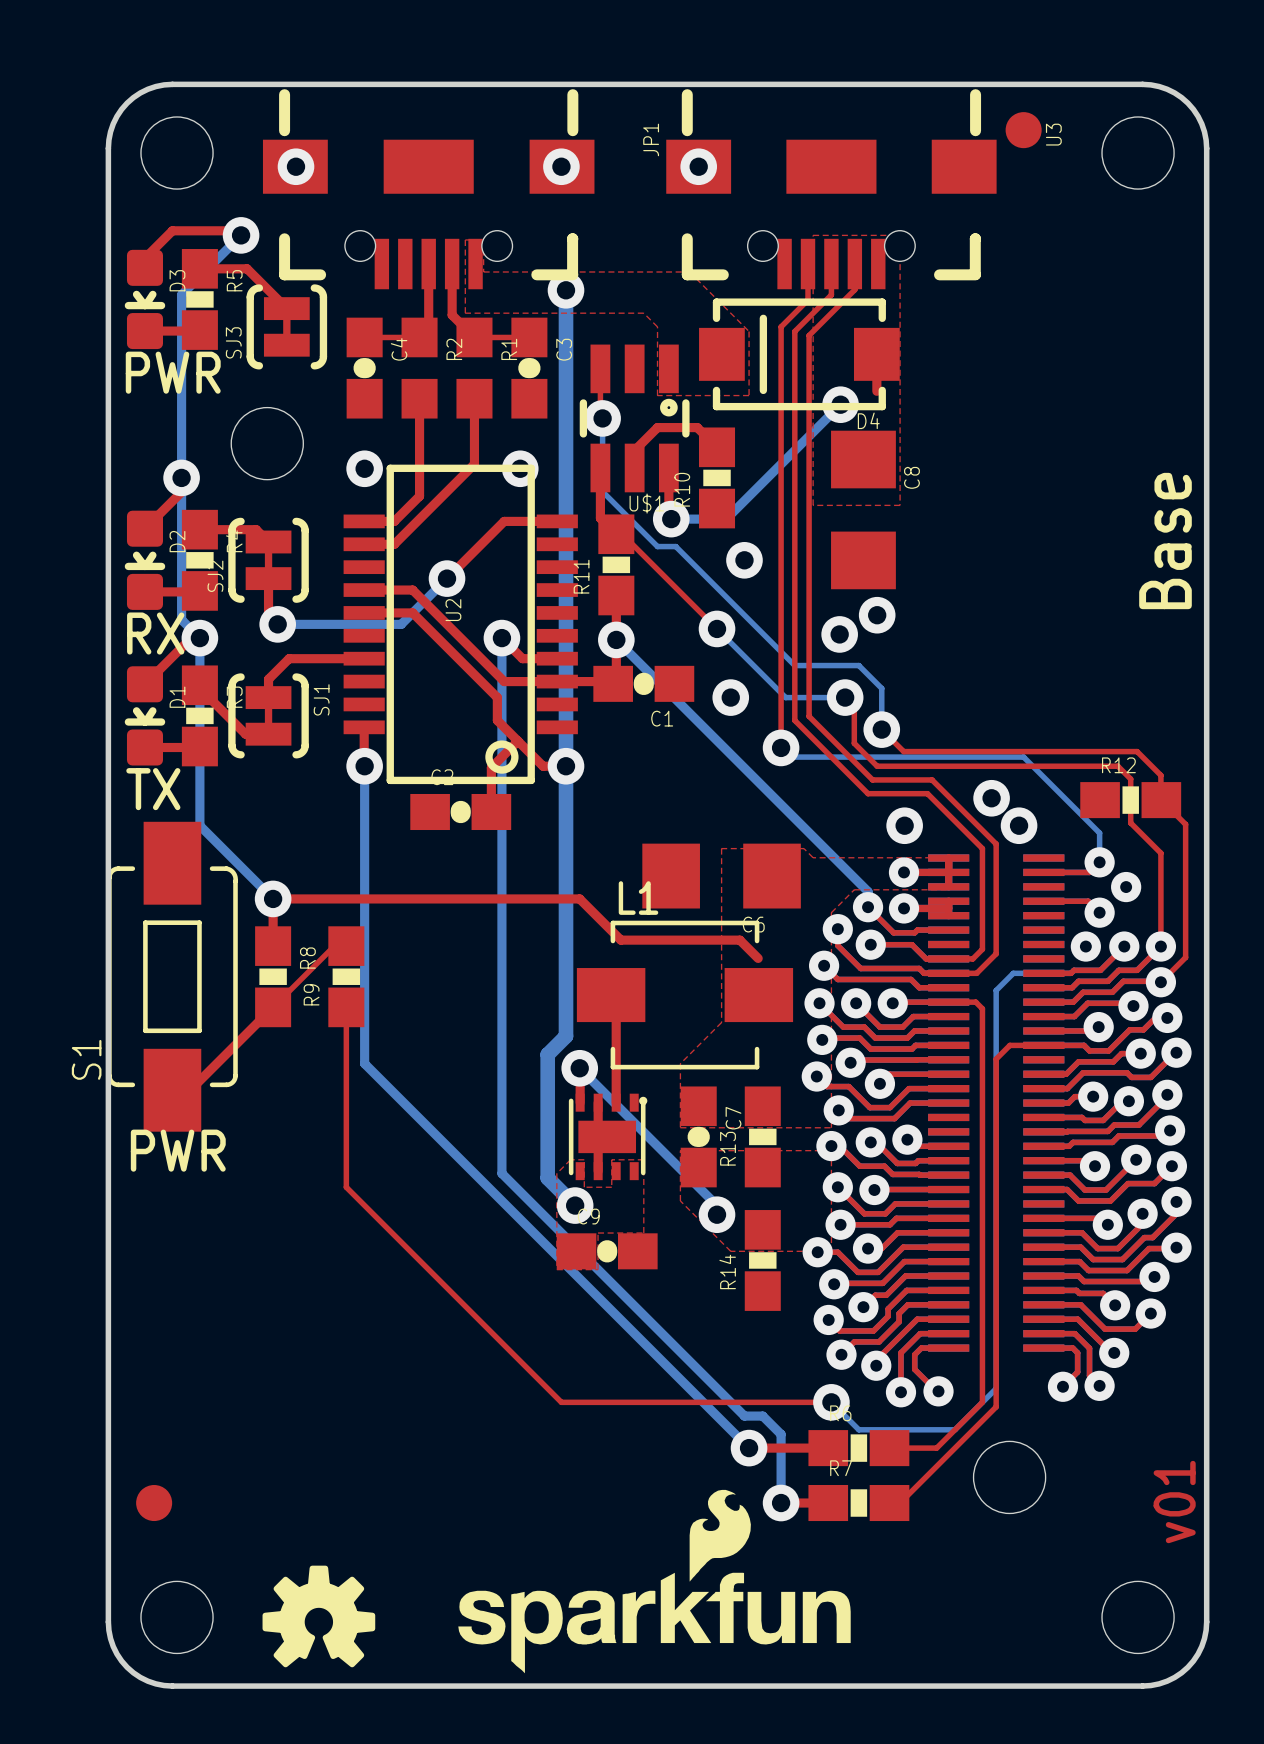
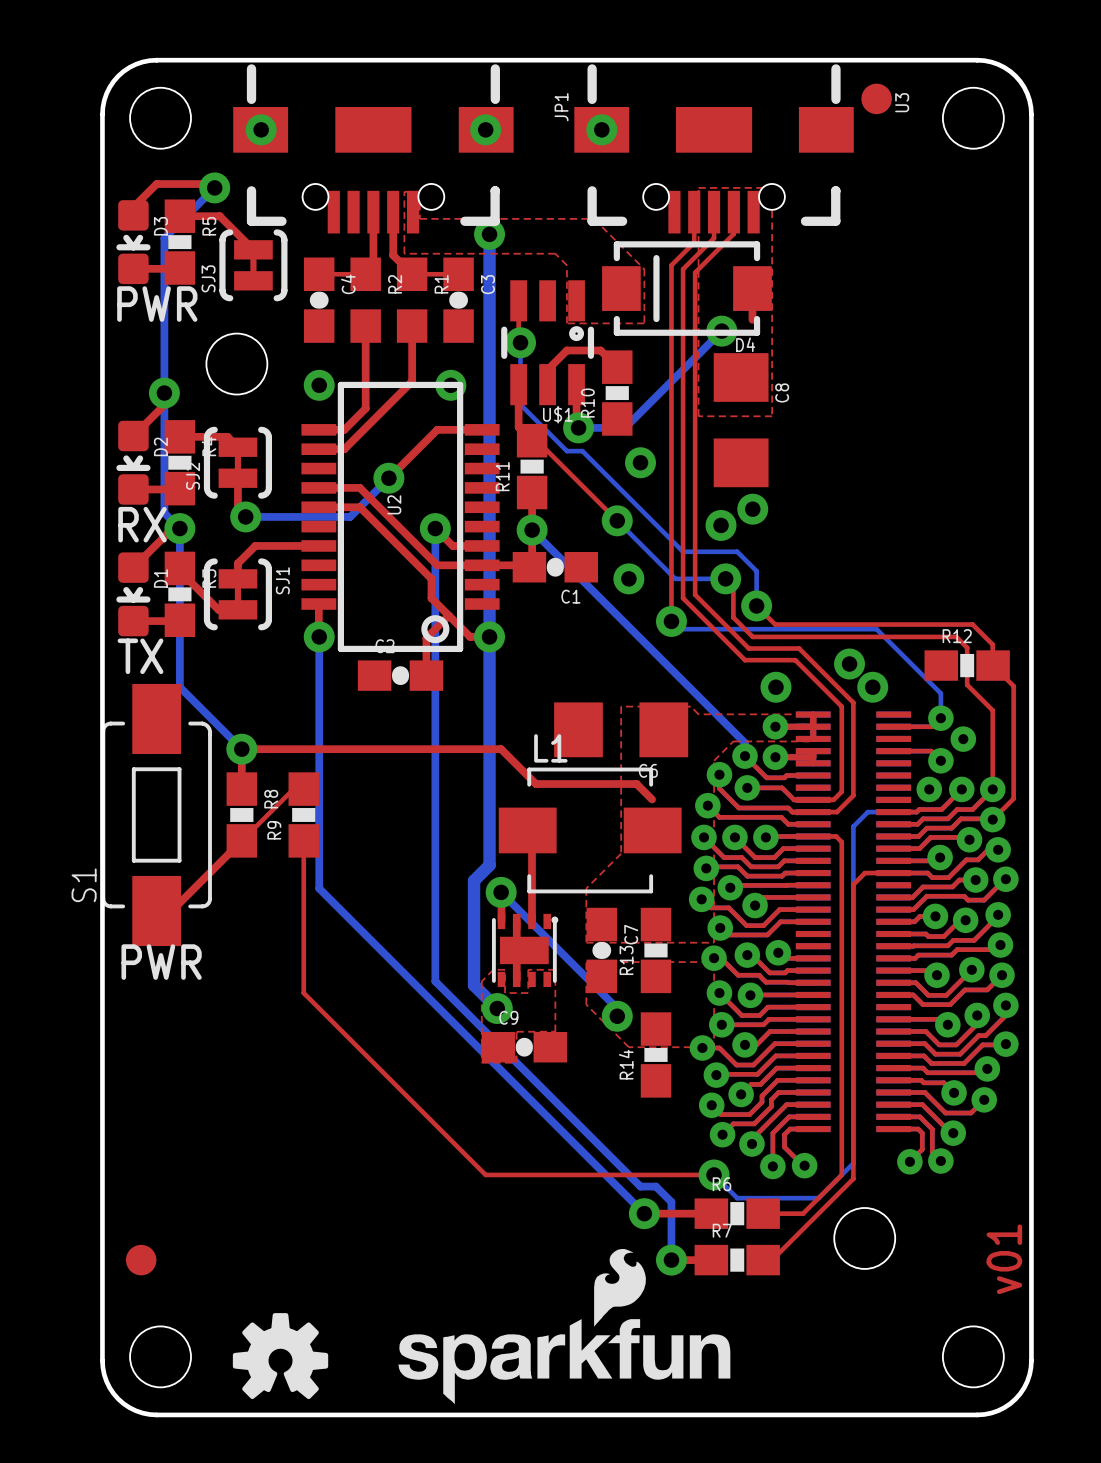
text: Base (1165, 541) -> none

